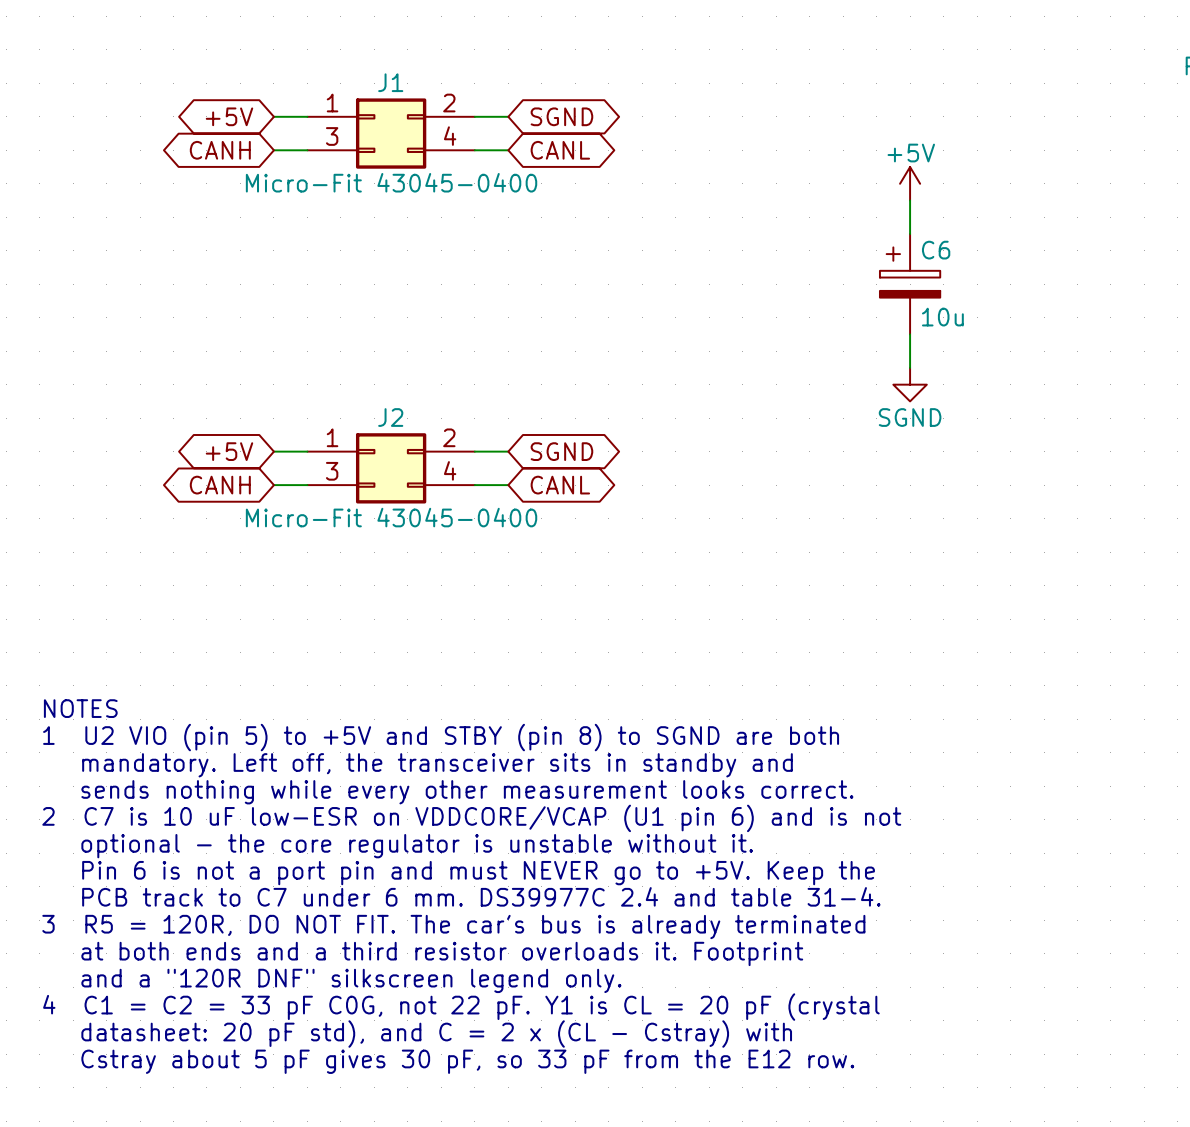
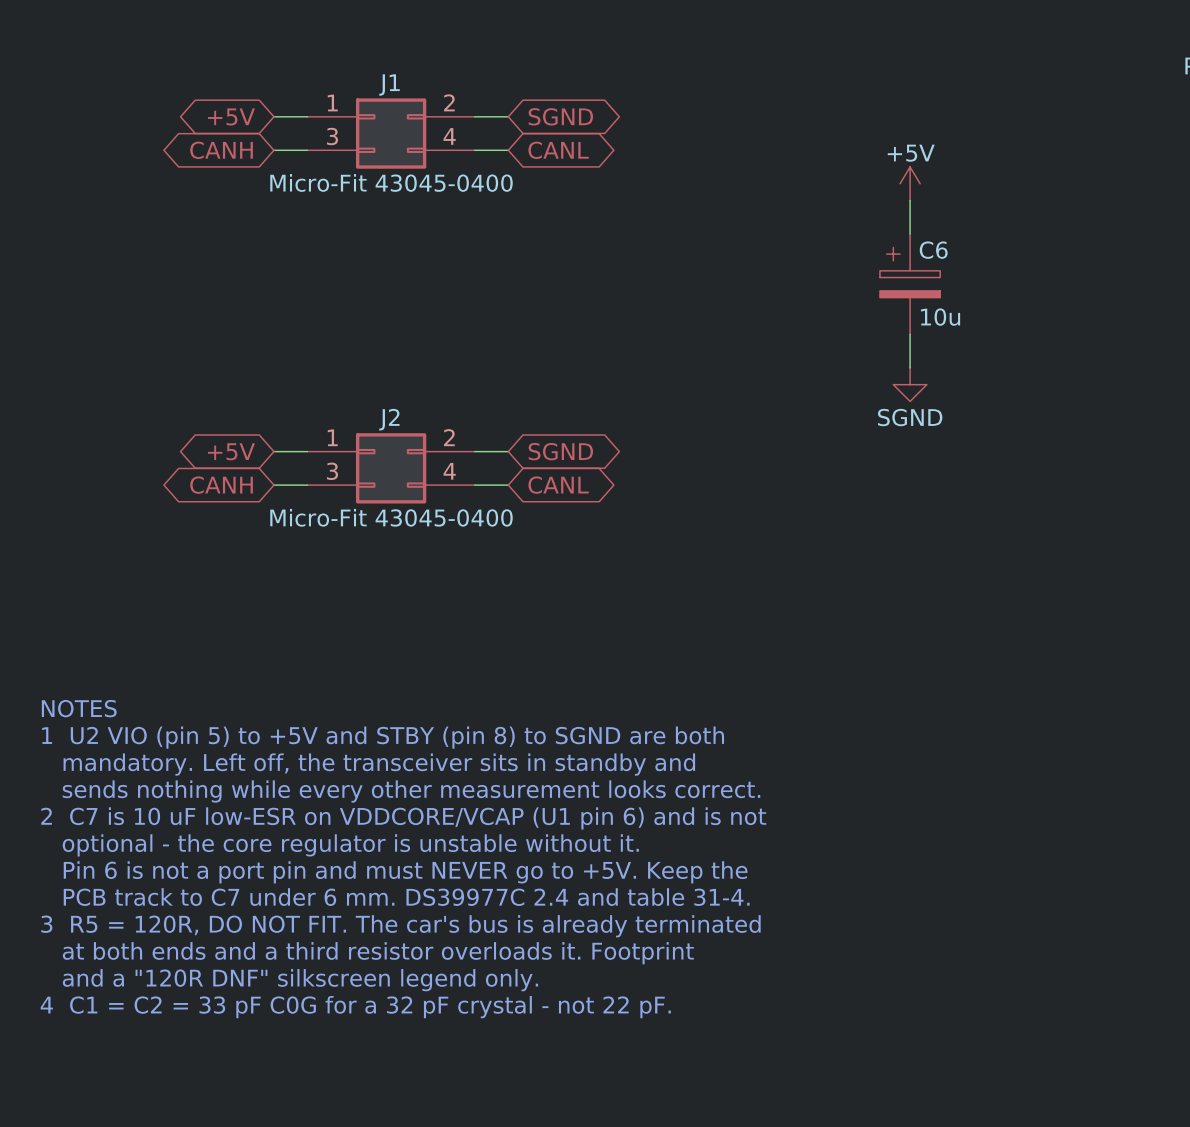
text: 4 C1 = C2 = 33 pF C0G, not 22 pF. Y1 is CL = 20 pF (crystal (461, 1007) -> 4 C1 = C2 = 33 pF C0G for a 32 pF crystal - not 22 pF. (355, 1007)
text: datasheet: 20 pF std), and C = 2 x (CL - Cstray) with (436, 1034) -> none
text: Cstray about 5 pF gives 30 pF, so 33 pF from the E12 row. (467, 1061) -> none

